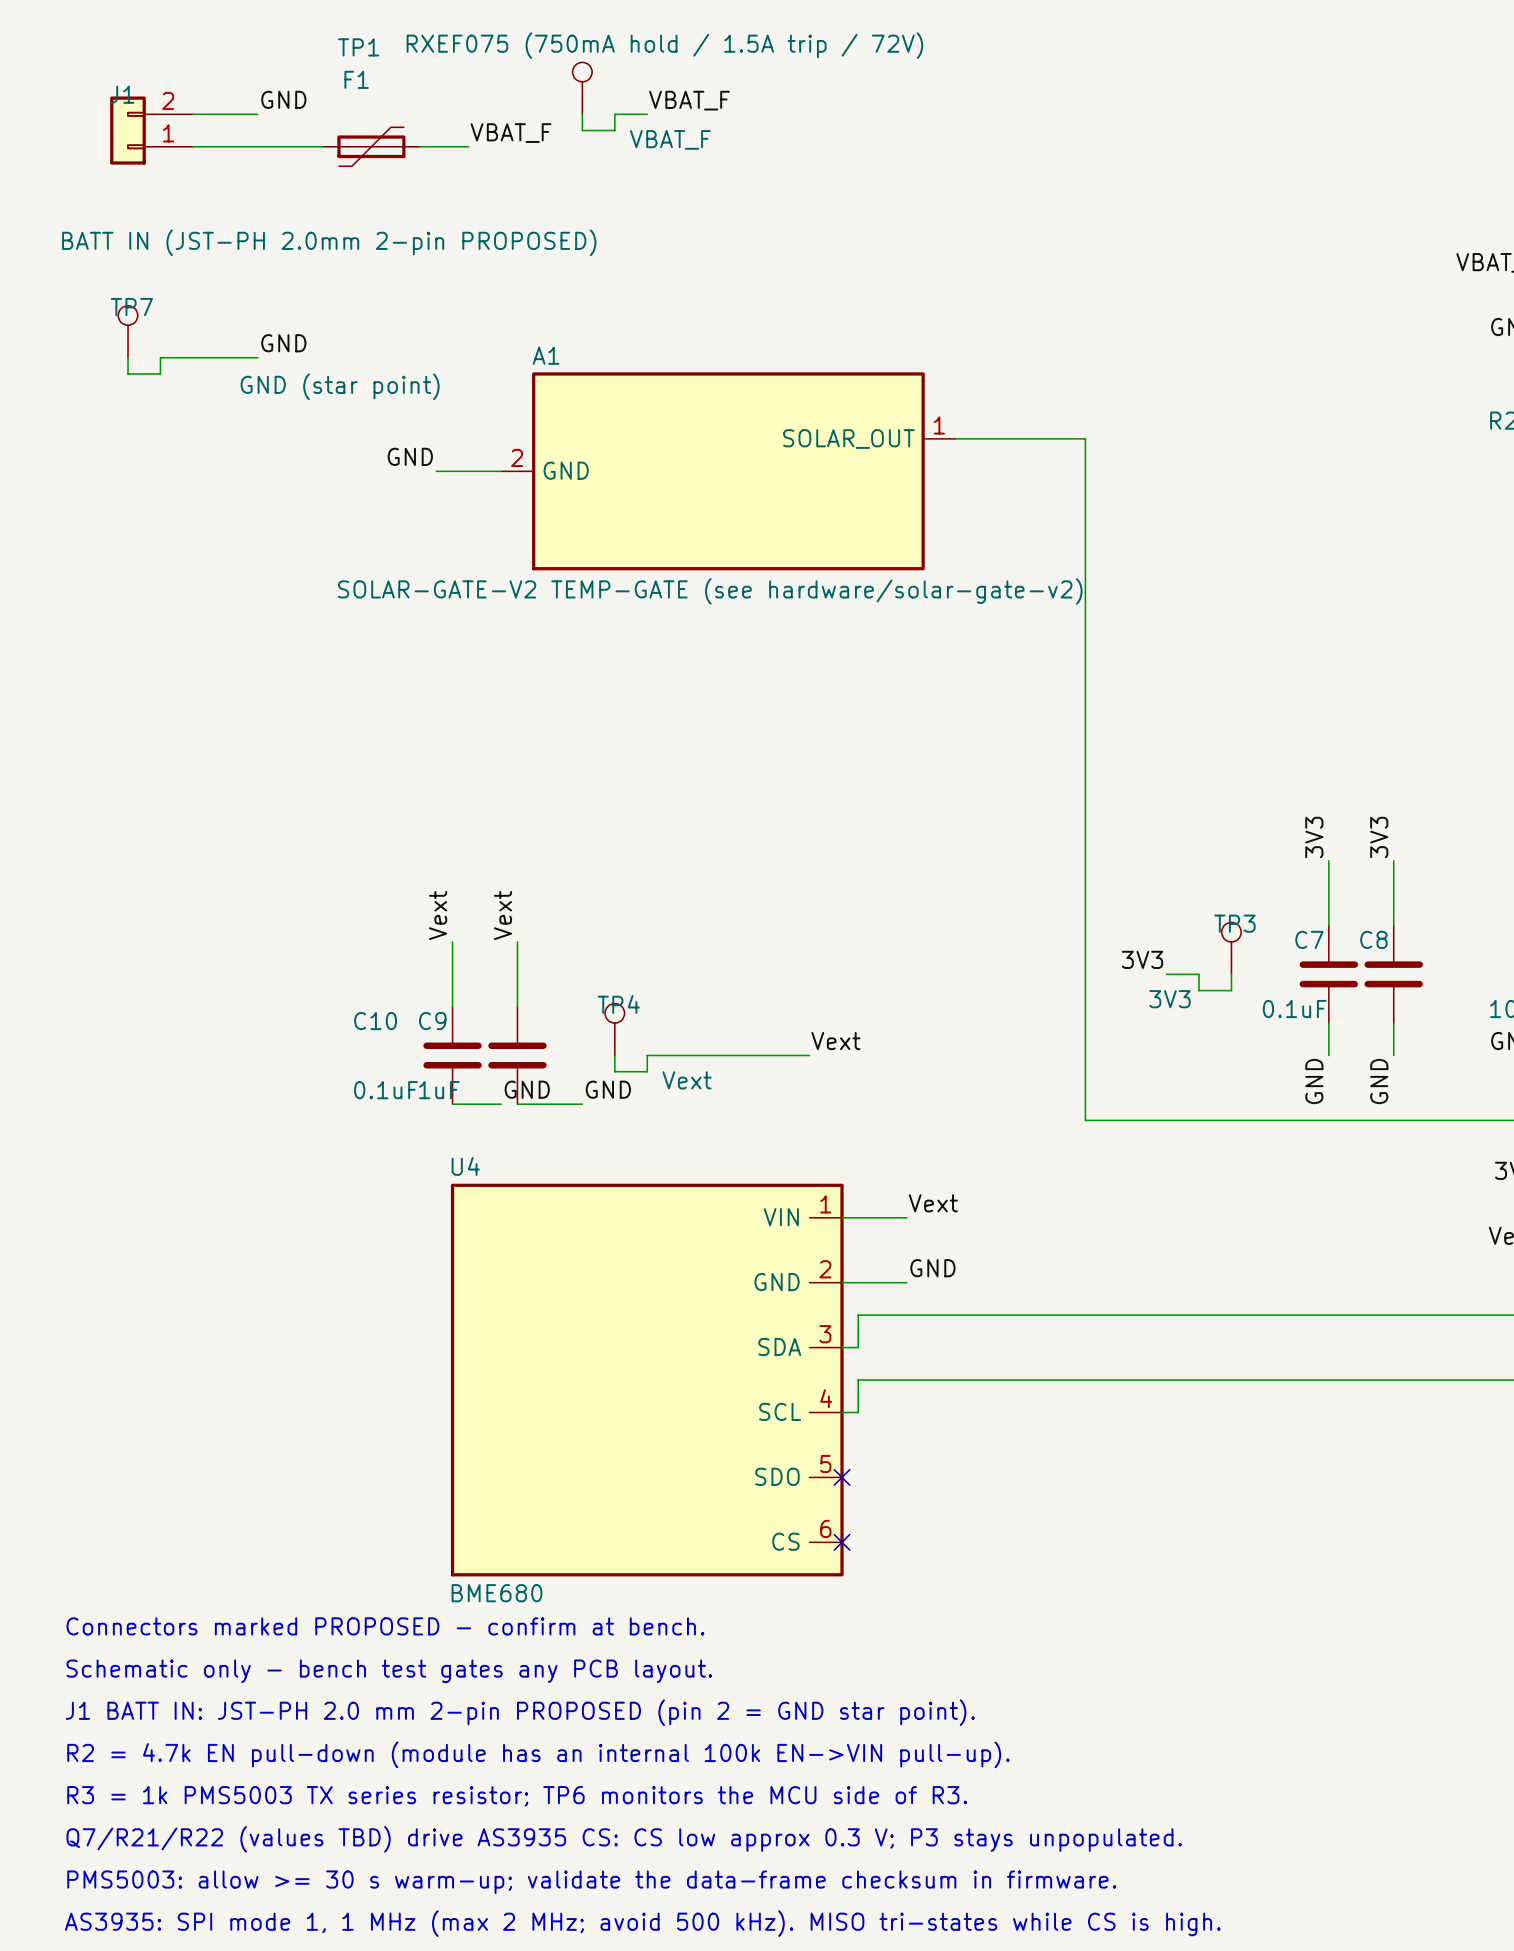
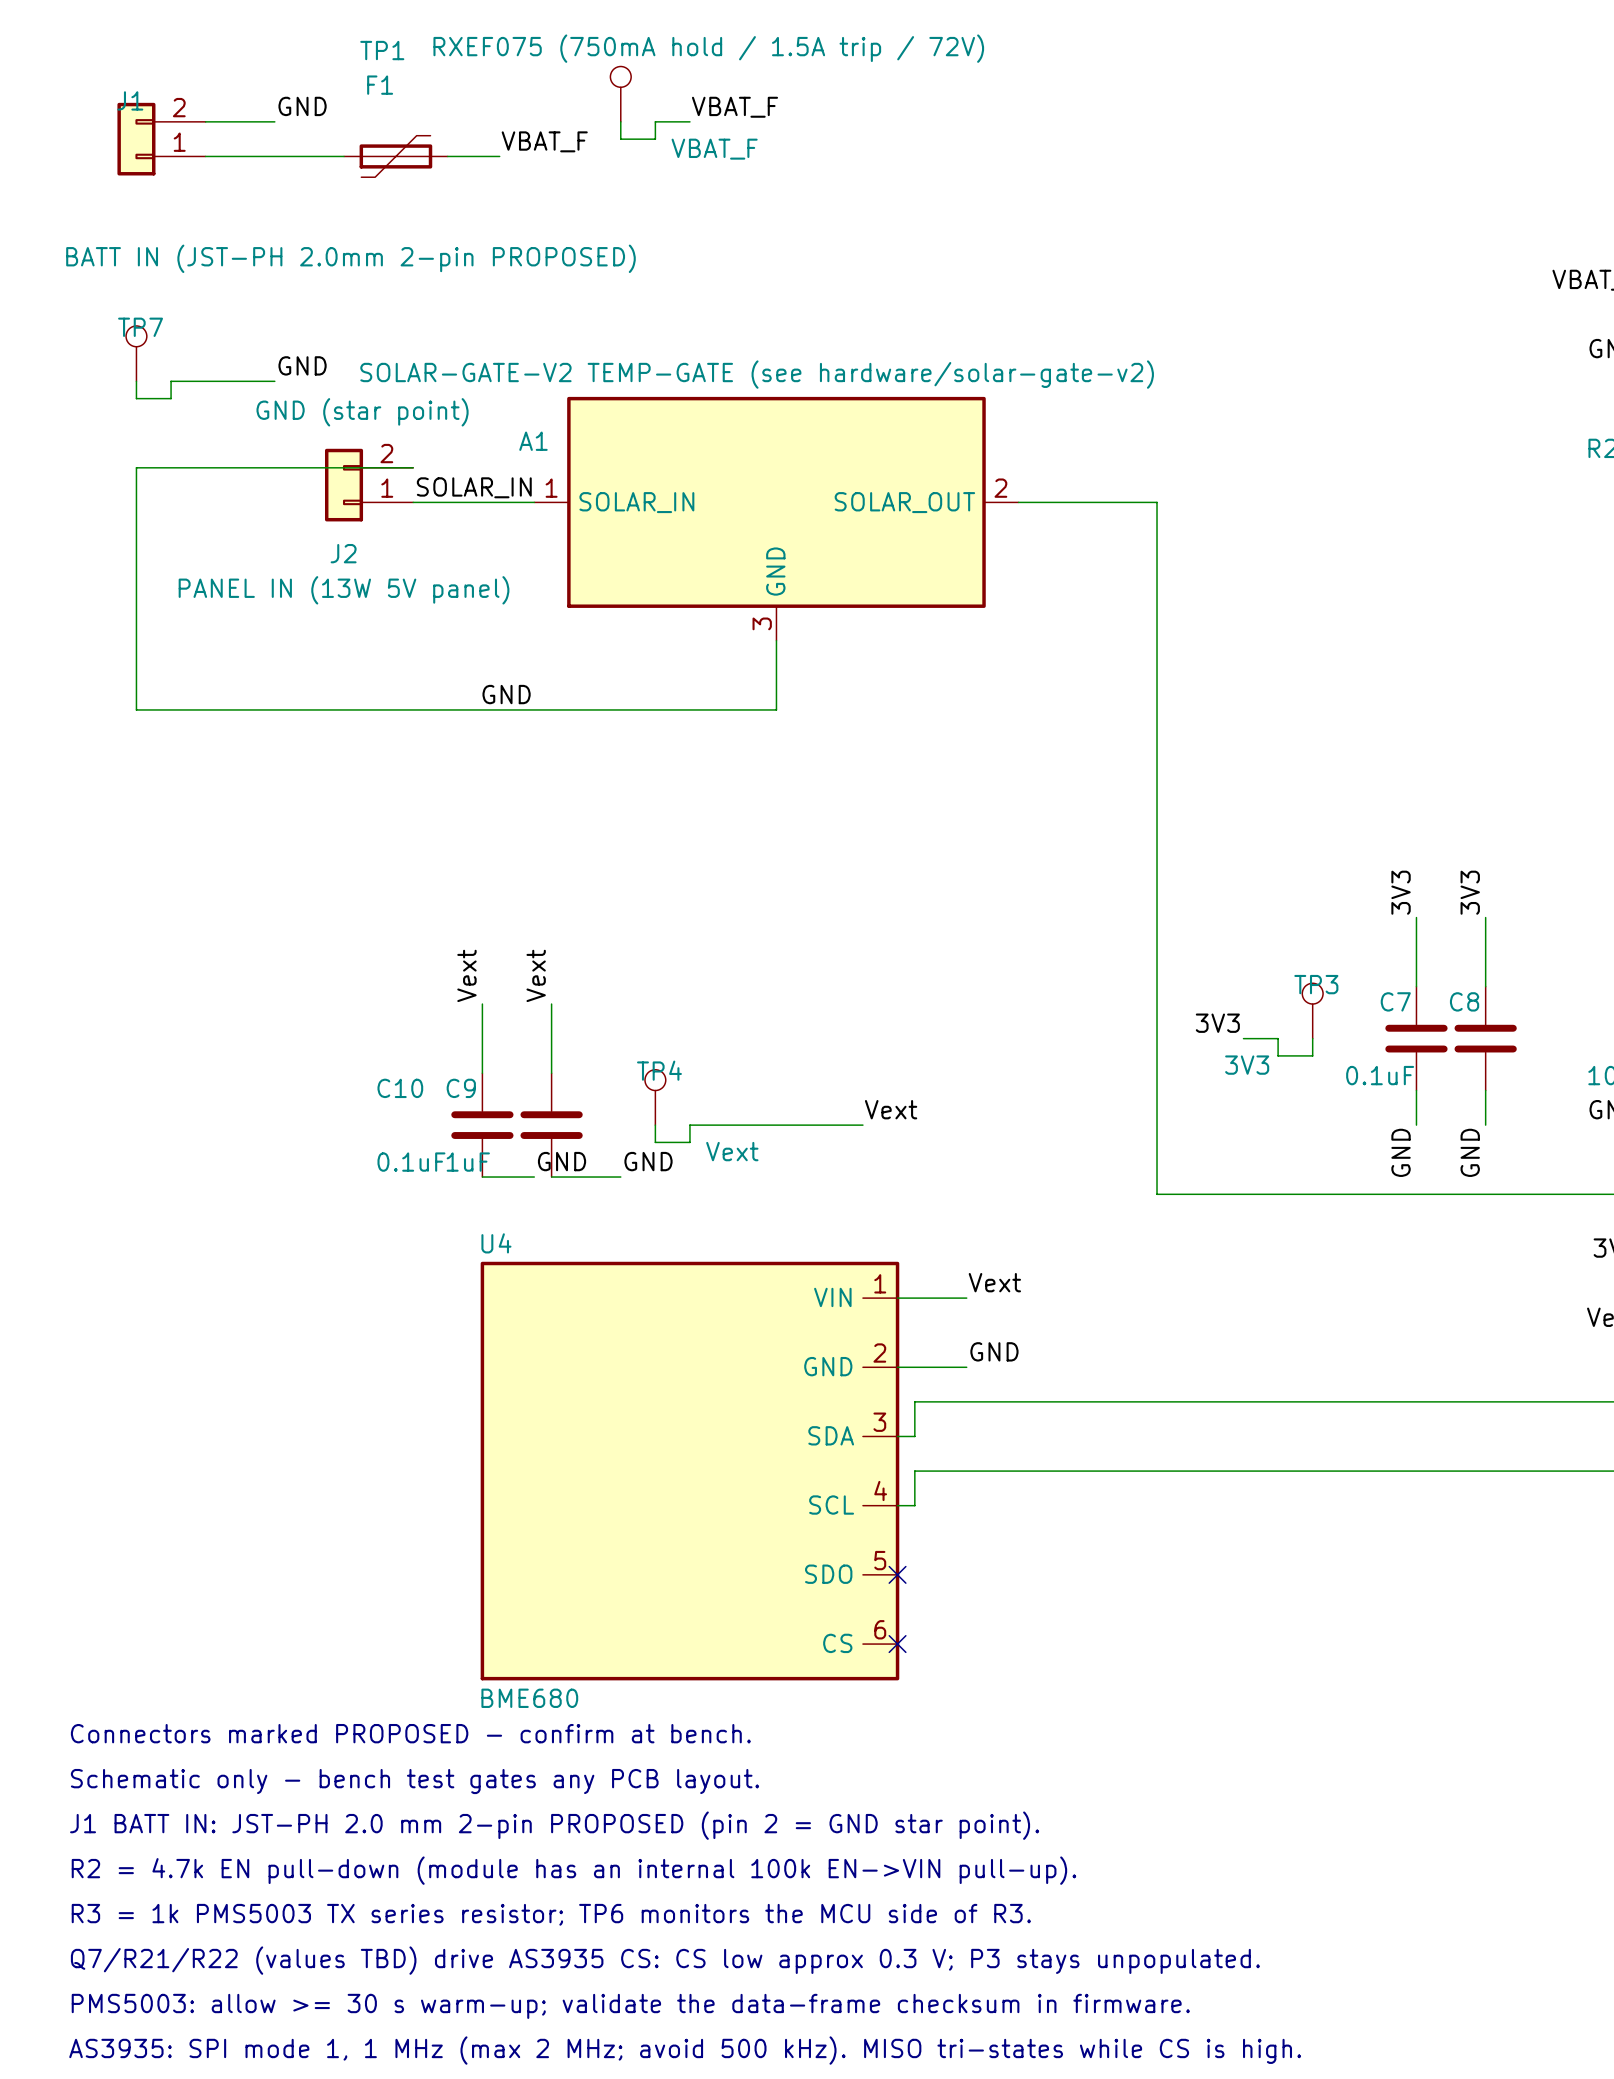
A1 name position: A1 (546, 355) -> A1 (533, 441)
A1 symbol: [501, 372, 956, 571] -> [534, 396, 1019, 641]
wire: none -> (413, 467) (136, 467) (136, 709) (776, 709) (776, 640)
wire: (955, 438) (1085, 438) (1085, 471) -> (1018, 502) (1157, 502)
J2: none -> PANEL IN (13W 5V panel) (369, 485)
label position: GND (410, 456) -> GND (506, 694)
label: none -> SOLAR_IN (474, 487)
wire: none -> (413, 502) (465, 502)
A1 value position: SOLAR-GATE-V2 TEMP-GATE (see hardware/solar-gate-v2) (710, 591) -> SOLAR-GATE-V2 TEMP-GATE (see hardware/solar-gate-v2) (757, 374)

